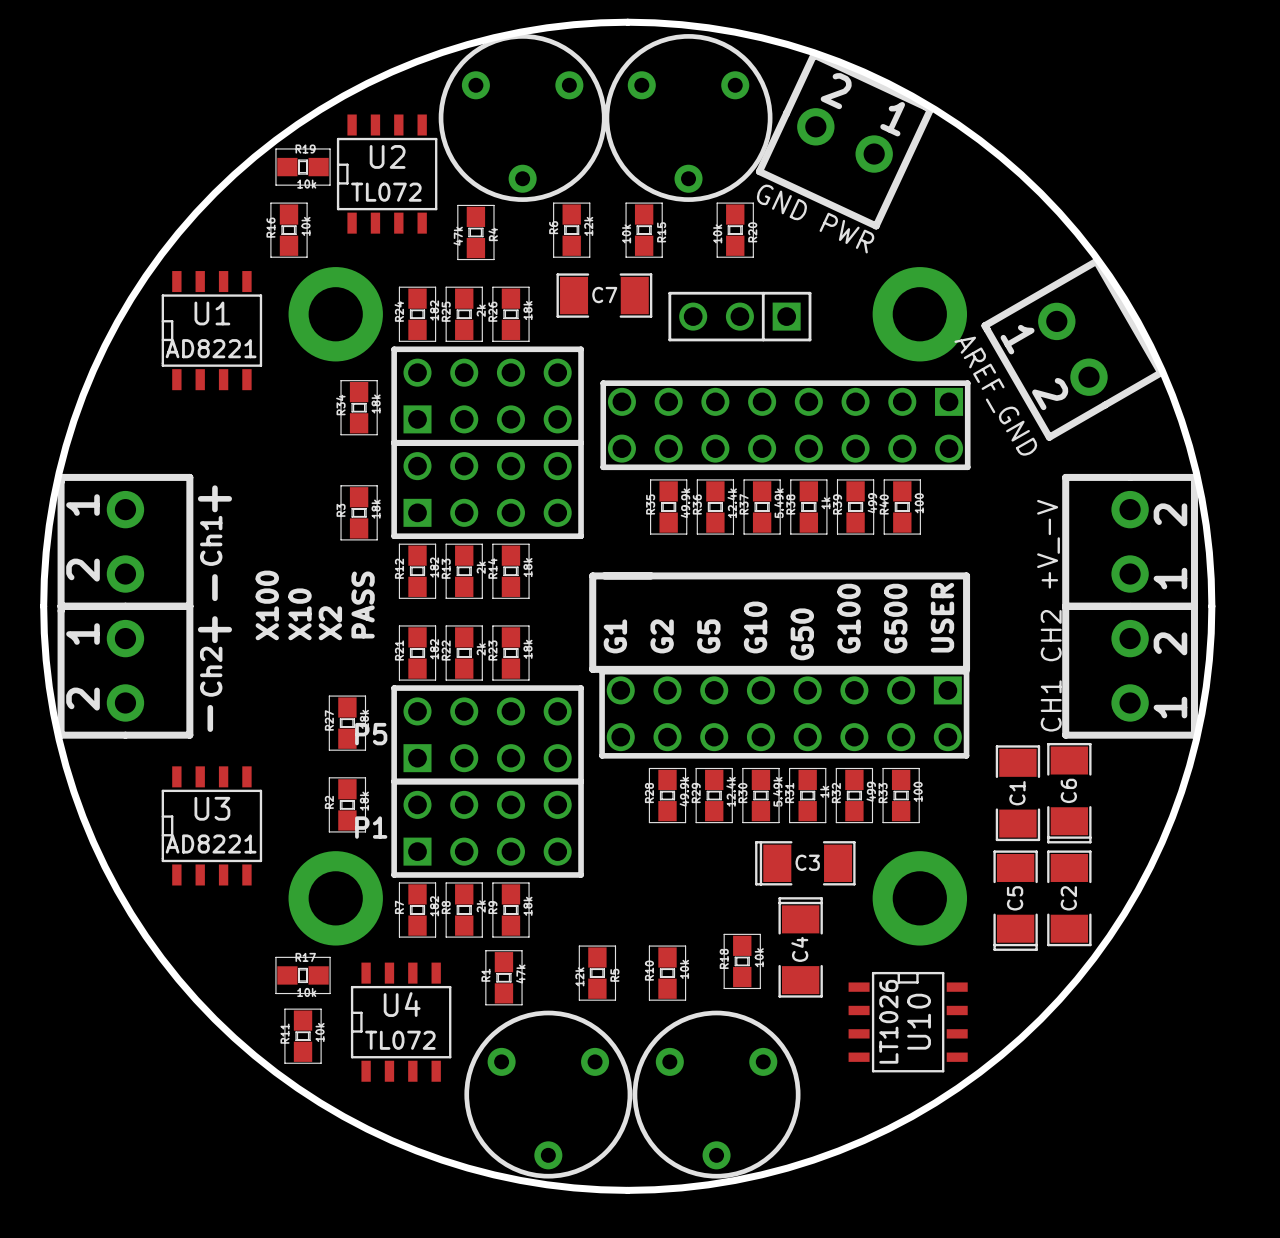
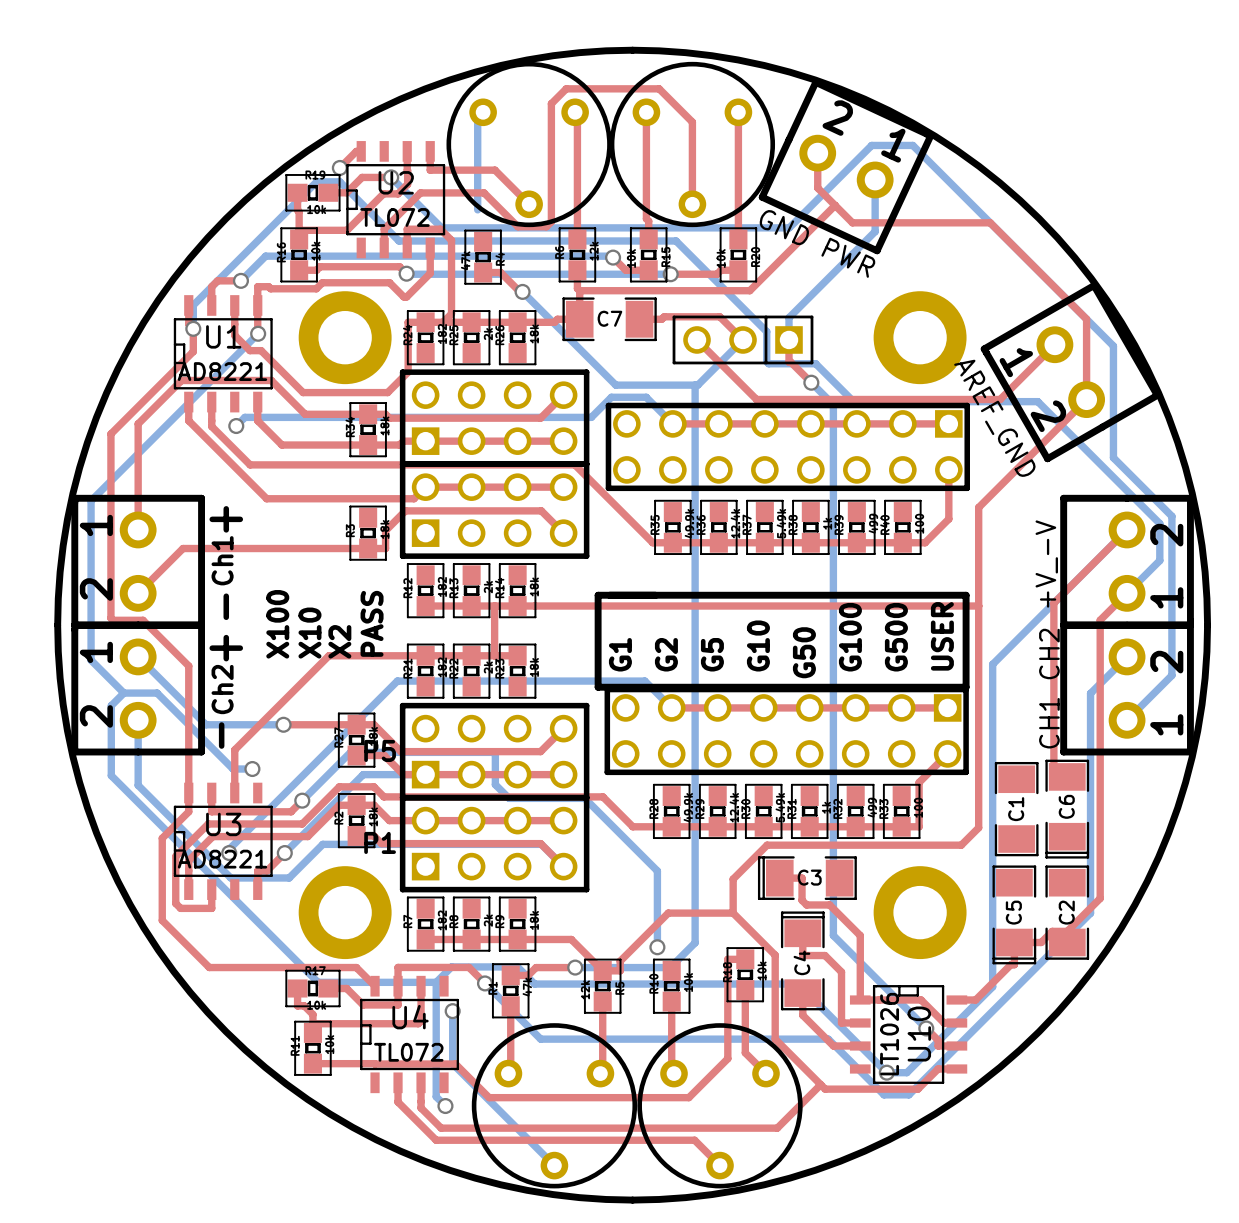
bottom track: none -> (483, 112) (477, 117) (477, 209)
top track: none -> (575, 112) (577, 114) (577, 239)
top track: none -> (646, 112) (646, 218) (648, 221) (648, 239)
top track: none -> (738, 112) (738, 239)
top track: none -> (361, 151) (356, 151) (339, 167)
top track: none -> (407, 151) (407, 184) (398, 193) (383, 193) (347, 230) (299, 230)
top track: none -> (430, 151) (430, 170) (494, 170) (529, 204)
top track: none -> (817, 153) (817, 188) (852, 222) (990, 222) (1086, 319) (1086, 399) (978, 507) (978, 827) (961, 845) (767, 845) (733, 879) (733, 913)
via: none -> (339, 167)
top track: none -> (391, 177) (362, 177) (346, 192) (328, 192)
bottom track: none -> (391, 177) (441, 227) (789, 227) (871, 145) (912, 145) (1113, 346) (1113, 457) (1171, 516) (1171, 675) (1127, 720)
via: none -> (391, 177)
bottom track: none -> (875, 179) (875, 231) (789, 317) (789, 339)
top track: none -> (297, 192) (299, 239)
top track: none -> (692, 204) (692, 122) (659, 88) (566, 88) (551, 103) (551, 221) (546, 226) (517, 226) (484, 192) (420, 192) (384, 229) (384, 247)
top track: none -> (835, 205) (749, 290) (579, 290) (577, 288) (577, 270)
top track: none -> (407, 247) (407, 229) (440, 229) (451, 240) (451, 313) (443, 322)
top track: none -> (430, 247) (430, 273) (406, 296) (403, 296) (389, 282) (322, 282) (316, 288) (270, 288) (268, 286) (257, 286) (258, 333)
top track: none -> (613, 257) (625, 270) (648, 270)
bottom track: none -> (613, 257) (265, 256) (240, 280)
via: none -> (613, 257)
top track: none -> (299, 270) (316, 270) (320, 266) (399, 266) (406, 273)
top track: none -> (738, 270) (720, 270) (716, 274) (670, 274)
top track: none -> (483, 272) (500, 272) (519, 291) (522, 291)
bottom track: none -> (406, 273) (670, 274)
via: none -> (406, 273)
via: none -> (670, 274)
top track: none -> (240, 280) (217, 280) (211, 286) (211, 305)
via: none -> (240, 280)
top track: none -> (579, 290) (579, 319) (557, 319) (554, 322) (408, 322) (408, 372) (387, 392) (303, 392) (261, 350) (249, 350) (234, 335) (234, 305)
bottom track: none -> (522, 291) (615, 385) (697, 385) (743, 339)
via: none -> (522, 291)
top track: none -> (188, 305) (188, 324) (193, 328) (193, 351) (110, 433) (110, 618) (113, 620) (143, 620) (188, 666) (188, 811) (162, 838) (162, 920) (209, 967) (356, 967) (375, 986)
top track: none -> (639, 319) (661, 319) (664, 316) (719, 316) (743, 339)
bottom track: none -> (193, 328) (193, 305) (316, 181) (339, 181) (399, 240) (676, 240) (766, 331) (766, 361) (768, 363) (815, 363) (853, 401) (1037, 401) (1159, 523) (1159, 560) (1127, 593)
via: none -> (193, 328)
bottom track: none -> (258, 333) (91, 500) (91, 660) (123, 693)
via: none -> (258, 333)
top track: none -> (697, 339) (756, 399) (1000, 399) (1054, 344)
top track: none -> (789, 339) (789, 362) (811, 382)
bottom track: none -> (811, 382) (833, 404) (833, 935) (926, 1028)
via: none -> (811, 382)
bottom track: none -> (695, 385) (695, 942) (670, 967) (575, 967)
top track: none -> (563, 395) (540, 418) (389, 418) (385, 414) (305, 414) (271, 380) (181, 380) (138, 423) (138, 529)
top track: none -> (188, 402) (188, 420) (266, 498) (414, 498) (425, 487) (563, 487)
top track: none -> (211, 402) (211, 426) (250, 464) (574, 464) (652, 542) (925, 542) (948, 519) (948, 469)
top track: none -> (257, 402) (257, 420) (281, 445) (399, 445) (403, 441) (563, 441)
top track: none -> (672, 423) (948, 423)
bottom track: none -> (672, 423) (646, 397) (611, 397) (591, 417) (244, 417) (236, 426)
via: none -> (236, 426)
top track: none -> (1127, 529) (1053, 603) (1053, 776)
bottom track: none -> (1127, 529) (992, 664) (992, 986) (906, 1072) (886, 1072) (798, 984) (534, 984) (517, 966) (451, 966) (436, 982)
top track: none -> (563, 533) (541, 510) (405, 510) (385, 530) (385, 548) (183, 548) (138, 593)
top track: none -> (1127, 593) (1100, 620) (1100, 898) (1067, 931)
top track: none -> (425, 606) (978, 606)
top track: none -> (494, 606) (494, 655)
top track: none -> (517, 655) (328, 655) (234, 749) (234, 793)
bottom track: none -> (138, 656) (206, 724) (283, 724)
bottom track: none -> (1127, 656) (1090, 693) (1090, 913) (908, 1094) (884, 1094) (828, 1039) (540, 1039) (485, 983)
bottom track: none -> (123, 693) (157, 693) (233, 769) (252, 769)
bottom track: none -> (123, 693) (111, 705) (111, 775) (318, 982) (436, 982)
top track: none -> (671, 707) (947, 707)
bottom track: none -> (671, 707) (644, 681) (397, 681) (229, 849) (229, 853)
bottom track: none -> (138, 720) (138, 785) (230, 877) (289, 877) (322, 844) (541, 844) (563, 866)
top track: none -> (283, 724) (374, 724) (400, 751) (540, 751) (563, 728)
via: none -> (283, 724)
top track: none -> (947, 753) (919, 782) (919, 826) (632, 826) (602, 796) (383, 796) (373, 786) (339, 786) (302, 823) (208, 823) (175, 856) (175, 903) (180, 908) (211, 908) (211, 889)
top track: none -> (356, 755) (384, 755) (403, 774) (563, 774)
via: none -> (252, 769)
bottom track: none -> (425, 774) (363, 774) (284, 853)
top track: none -> (211, 793) (211, 811) (291, 811) (302, 800)
bottom track: none -> (302, 800) (350, 752) (493, 752) (495, 754) (495, 784) (509, 798) (584, 798) (657, 870) (657, 947)
via: none -> (302, 800)
top track: none -> (563, 820) (389, 820) (374, 805) (339, 805) (307, 836) (212, 836) (188, 860) (188, 889)
top track: none -> (356, 835) (374, 835) (381, 843) (540, 843) (563, 866)
via: none -> (229, 853)
top track: none -> (284, 853) (266, 870) (257, 870) (257, 889)
via: none -> (284, 853)
top track: none -> (779, 878) (802, 878) (802, 900) (806, 904) (829, 904) (860, 935) (860, 1000) (921, 1000) (944, 1023) (956, 1023)
top track: none -> (733, 913) (775, 955) (775, 1039) (825, 1089) (917, 1089) (938, 1069) (956, 1069)
top track: none -> (733, 913) (668, 913) (620, 961) (620, 970) (602, 970) (571, 939) (425, 939)
top track: none -> (1067, 931) (1052, 931) (1041, 942) (1014, 942) (1014, 964) (1010, 964) (975, 1000) (956, 1000)
top track: none -> (802, 933) (802, 955) (825, 955) (841, 972) (841, 1023) (860, 1023)
via: none -> (657, 947)
top track: none -> (745, 959) (727, 959) (727, 1058) (688, 1097) (489, 1097) (455, 1064) (312, 1063)
top track: none -> (575, 967) (536, 967) (528, 975) (510, 975)
via: none -> (575, 967)
bottom track: none -> (436, 982) (436, 1096) (445, 1106)
top track: none -> (485, 983) (469, 967) (398, 967) (398, 1004) (363, 1004) (346, 988) (328, 988)
via: none -> (485, 983)
top track: none -> (421, 986) (421, 1020) (418, 1023) (312, 1023)
top track: none -> (297, 988) (297, 1005) (304, 1005) (312, 1014) (312, 1032)
top track: none -> (745, 990) (745, 1052) (766, 1073)
top track: none -> (802, 993) (802, 1015) (833, 1046) (860, 1046)
top track: none -> (602, 1001) (602, 1071) (600, 1073)
top track: none -> (671, 1001) (671, 1071) (674, 1073)
top track: none -> (510, 1006) (510, 1071) (508, 1073)
bottom track: none -> (452, 1011) (452, 1063) (554, 1165)
via: none -> (452, 1011)
top track: none -> (926, 1028) (938, 1040) (938, 1046) (956, 1046)
via: none -> (926, 1028)
via: none -> (886, 1072)
top track: none -> (398, 1082) (398, 1102) (436, 1140) (694, 1140) (720, 1165)
top track: none -> (421, 1082) (421, 1108) (441, 1128) (777, 1128) (820, 1084)
via: none -> (445, 1106)

